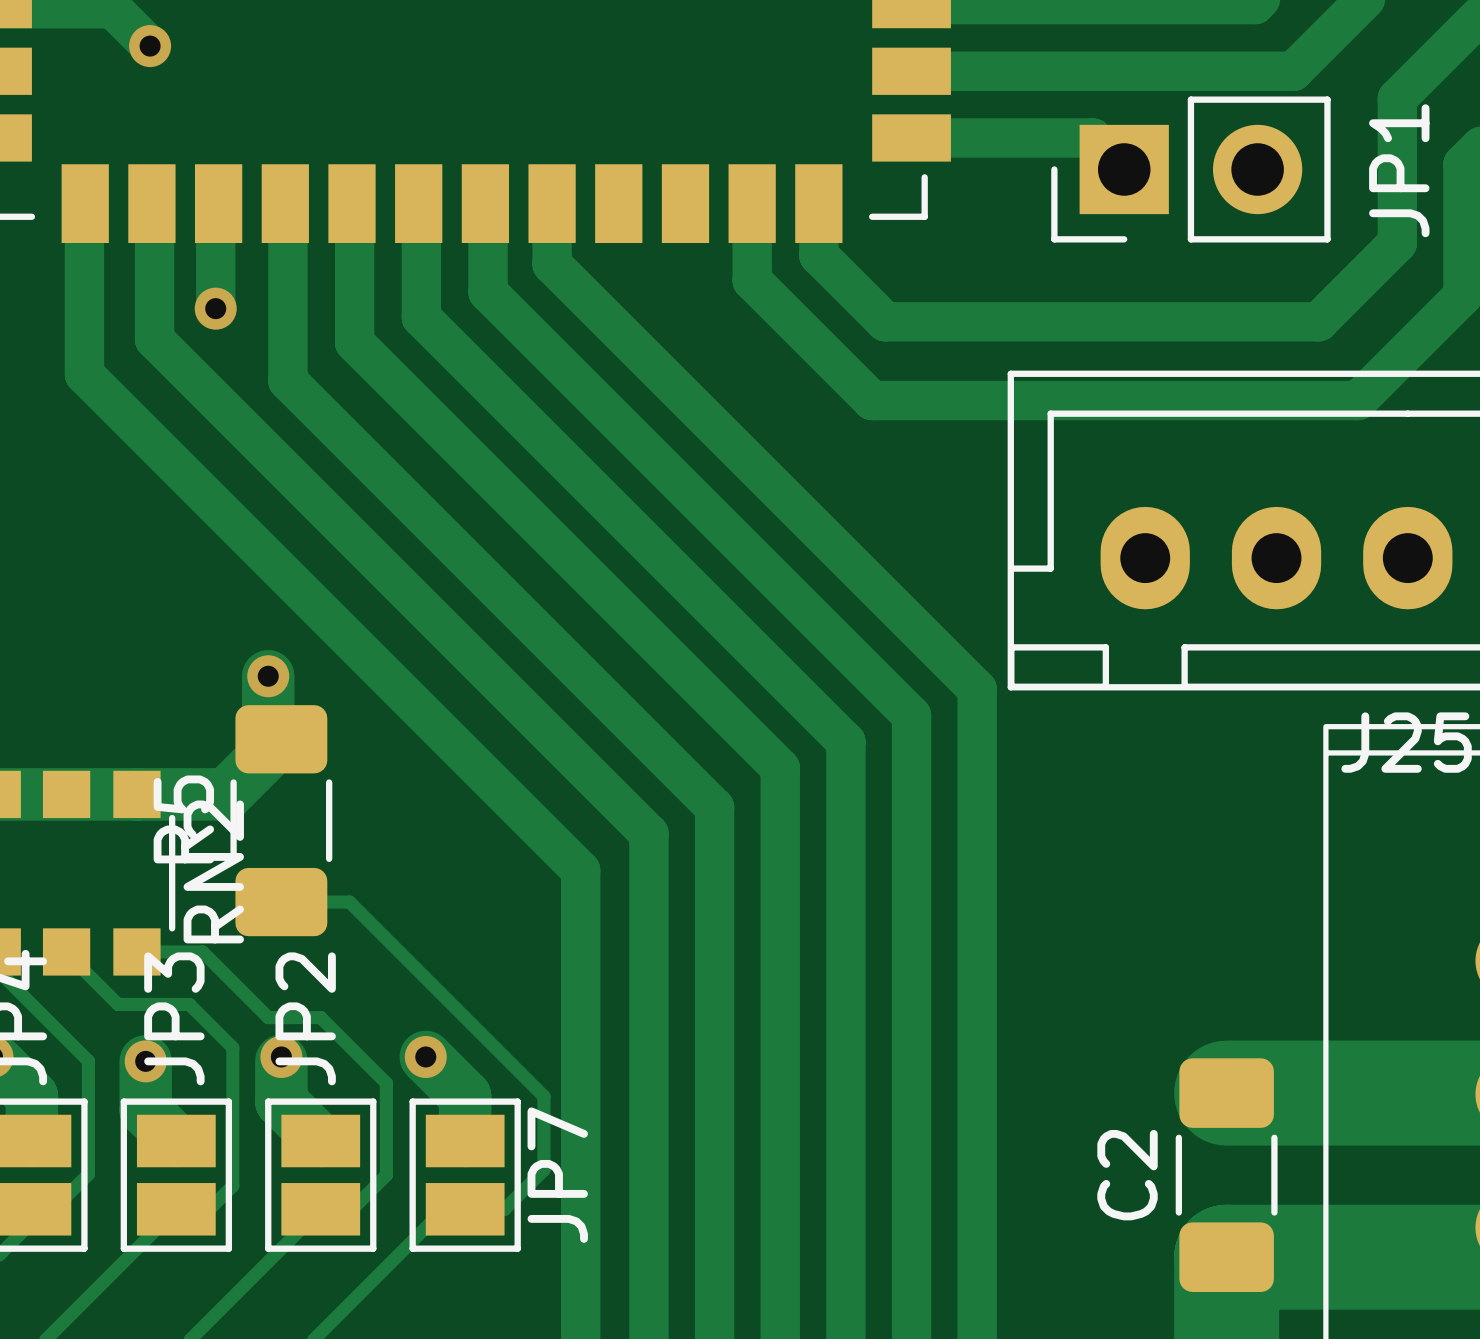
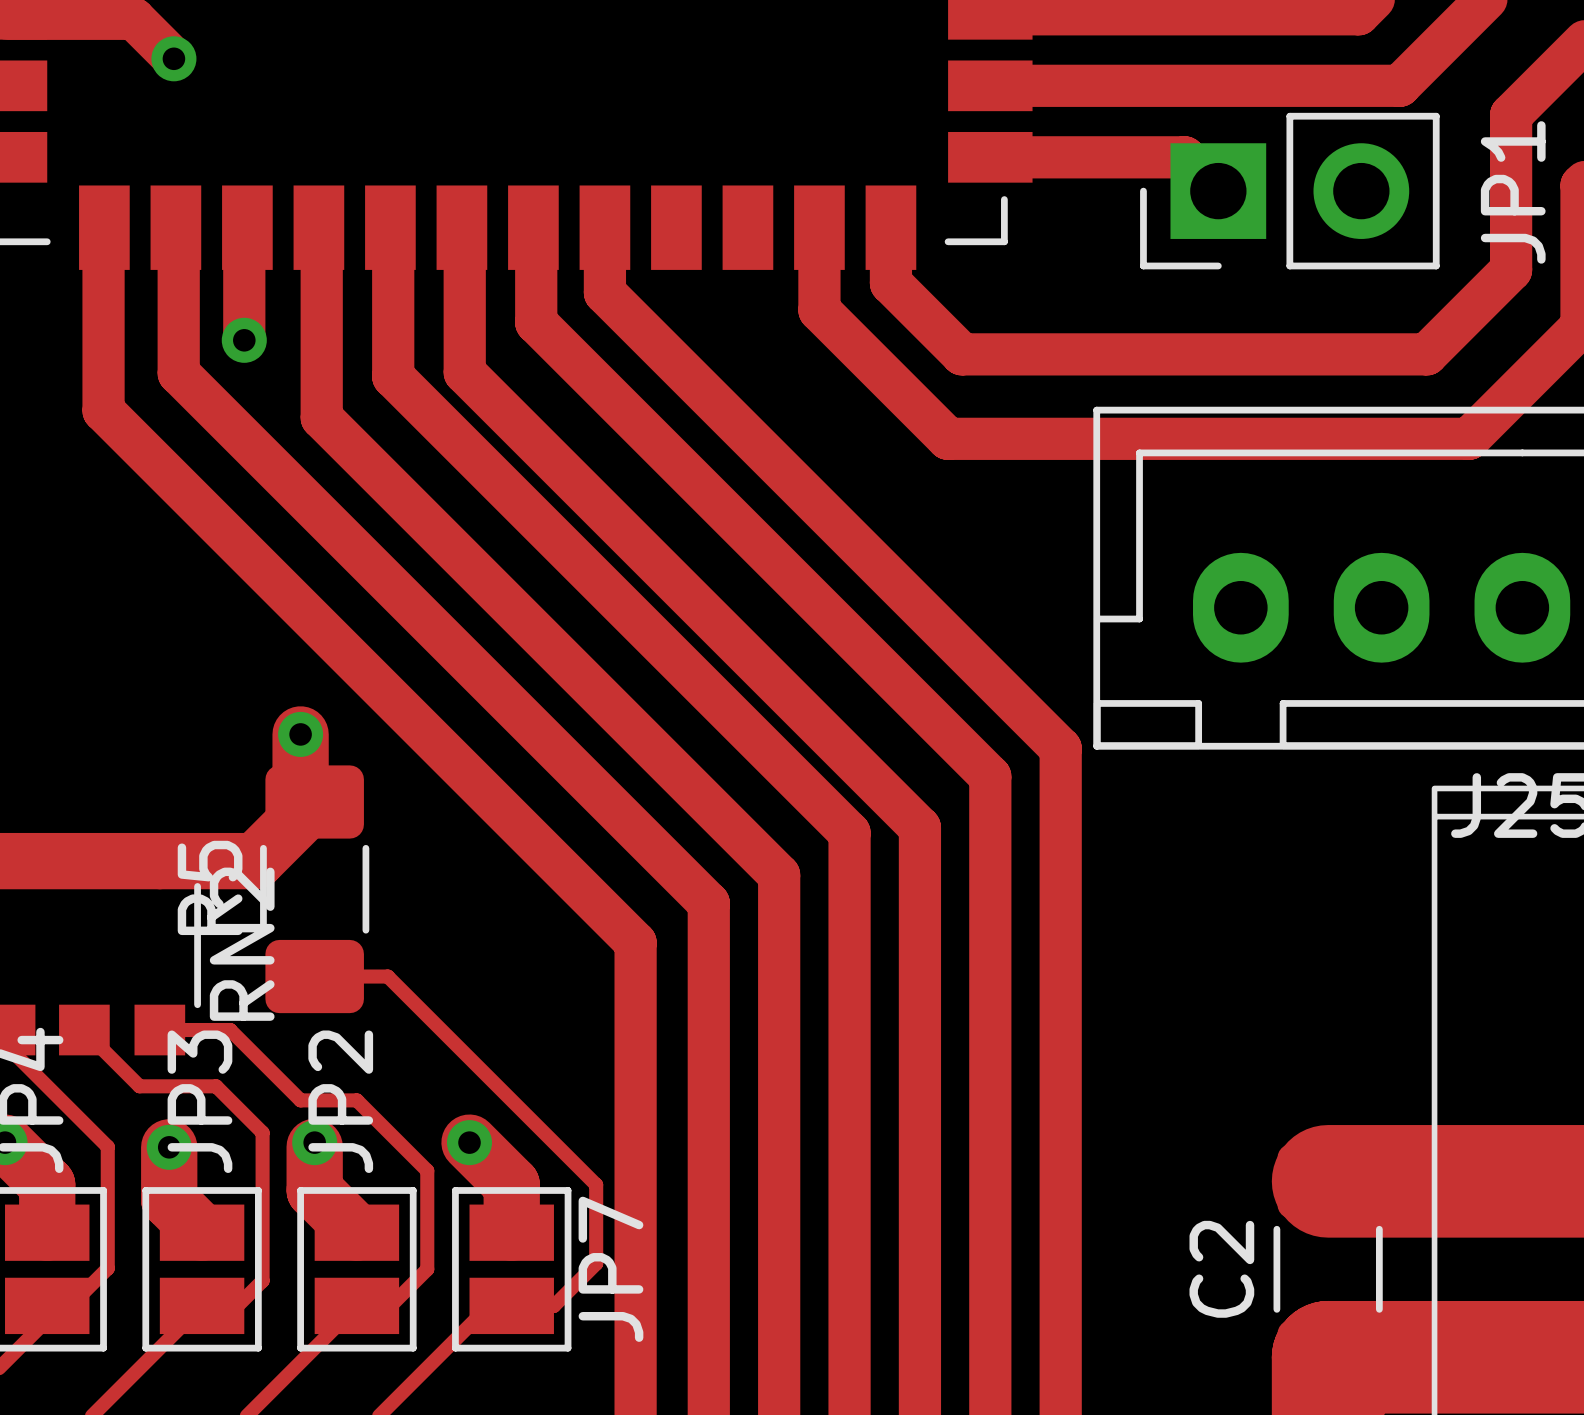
track: (421, 317) (845, 741) (845, 763) -> (464, 349) (464, 372) (919, 827)

